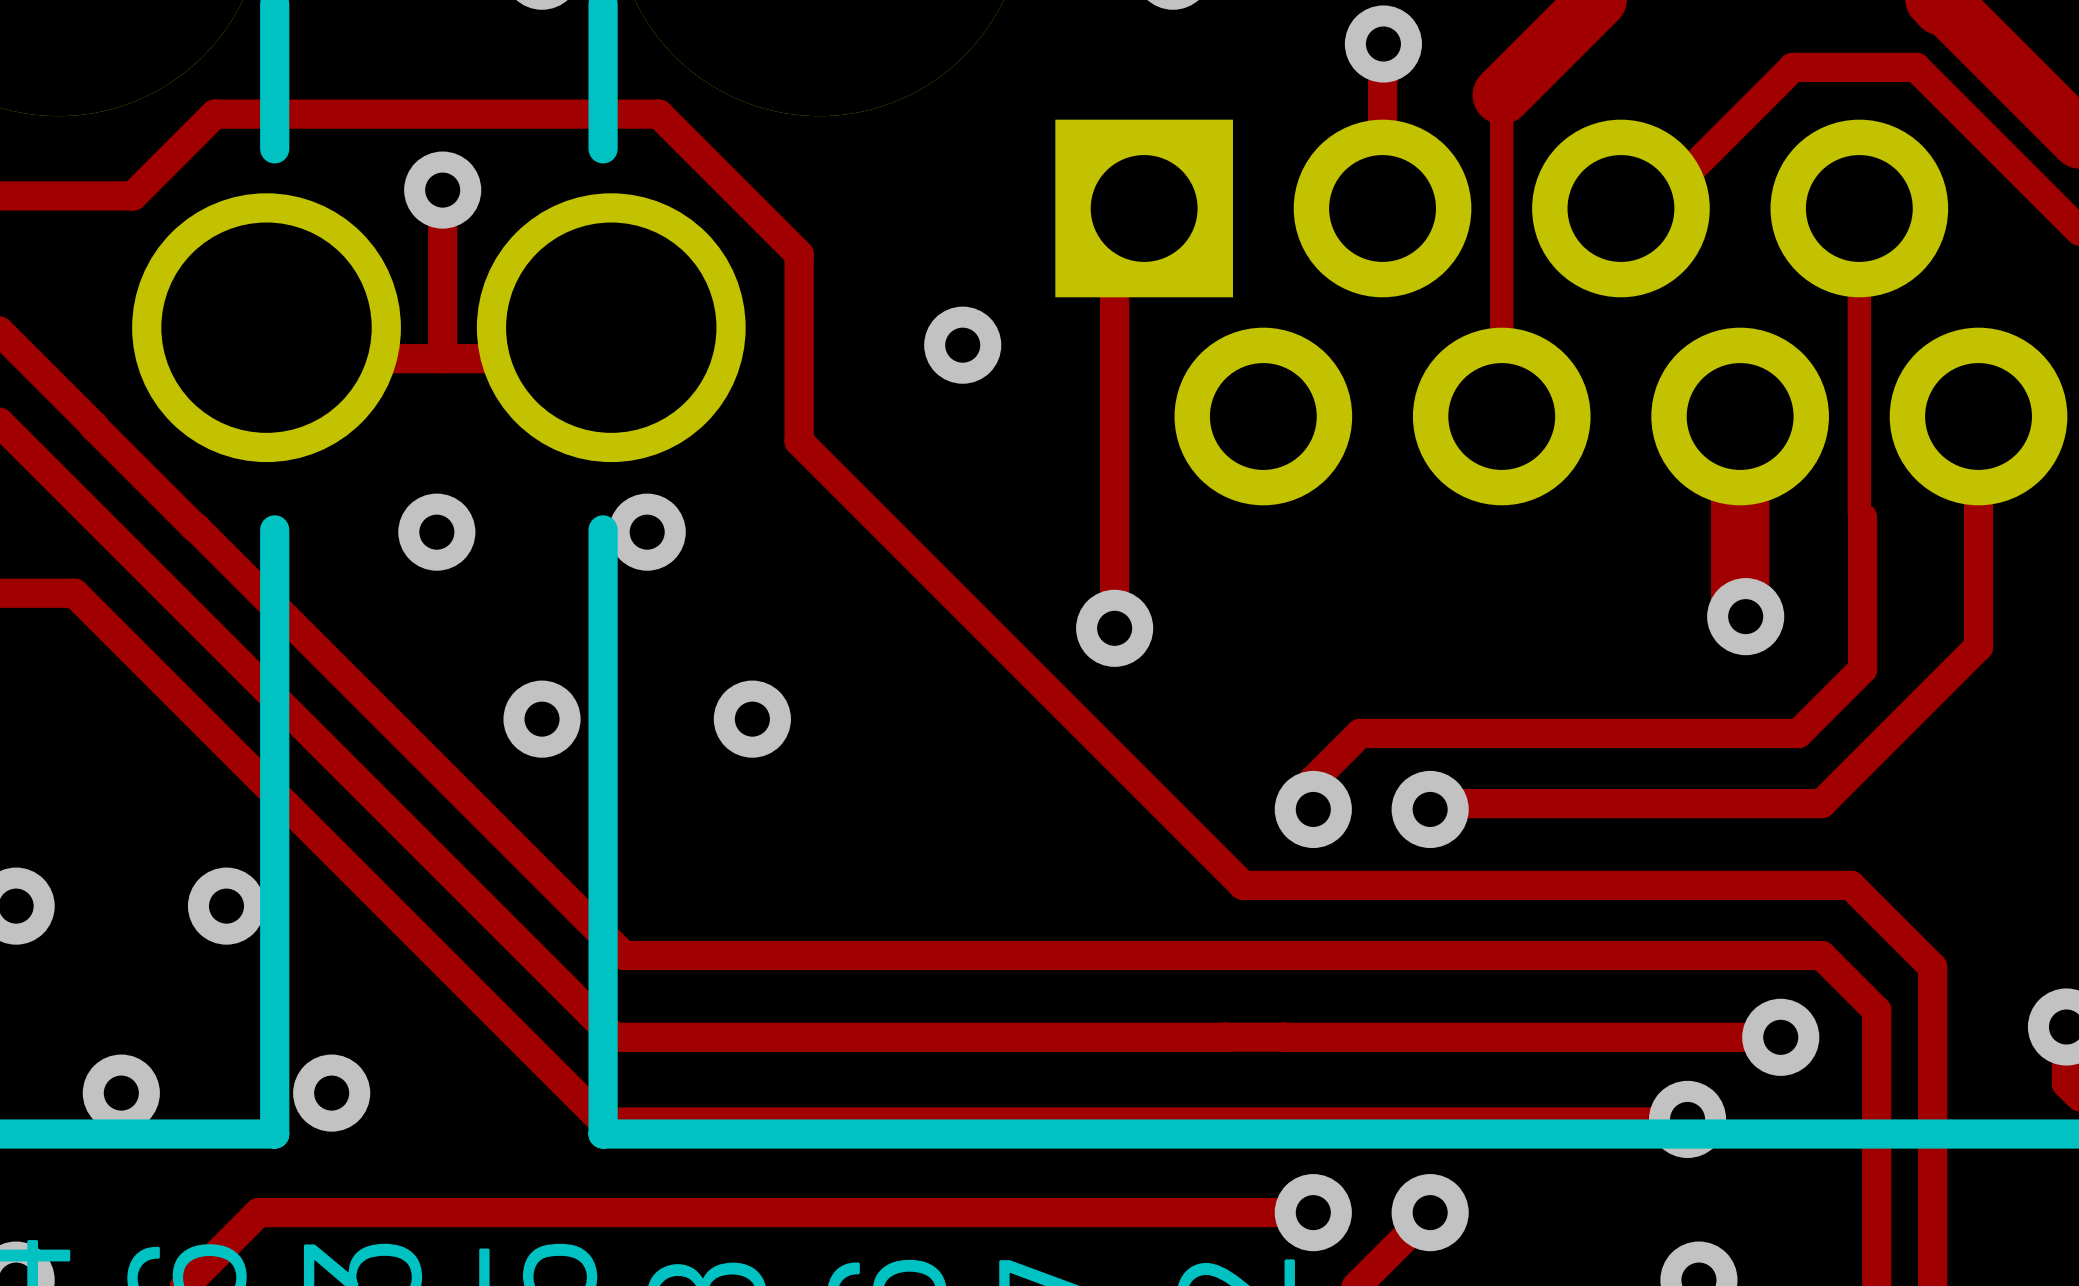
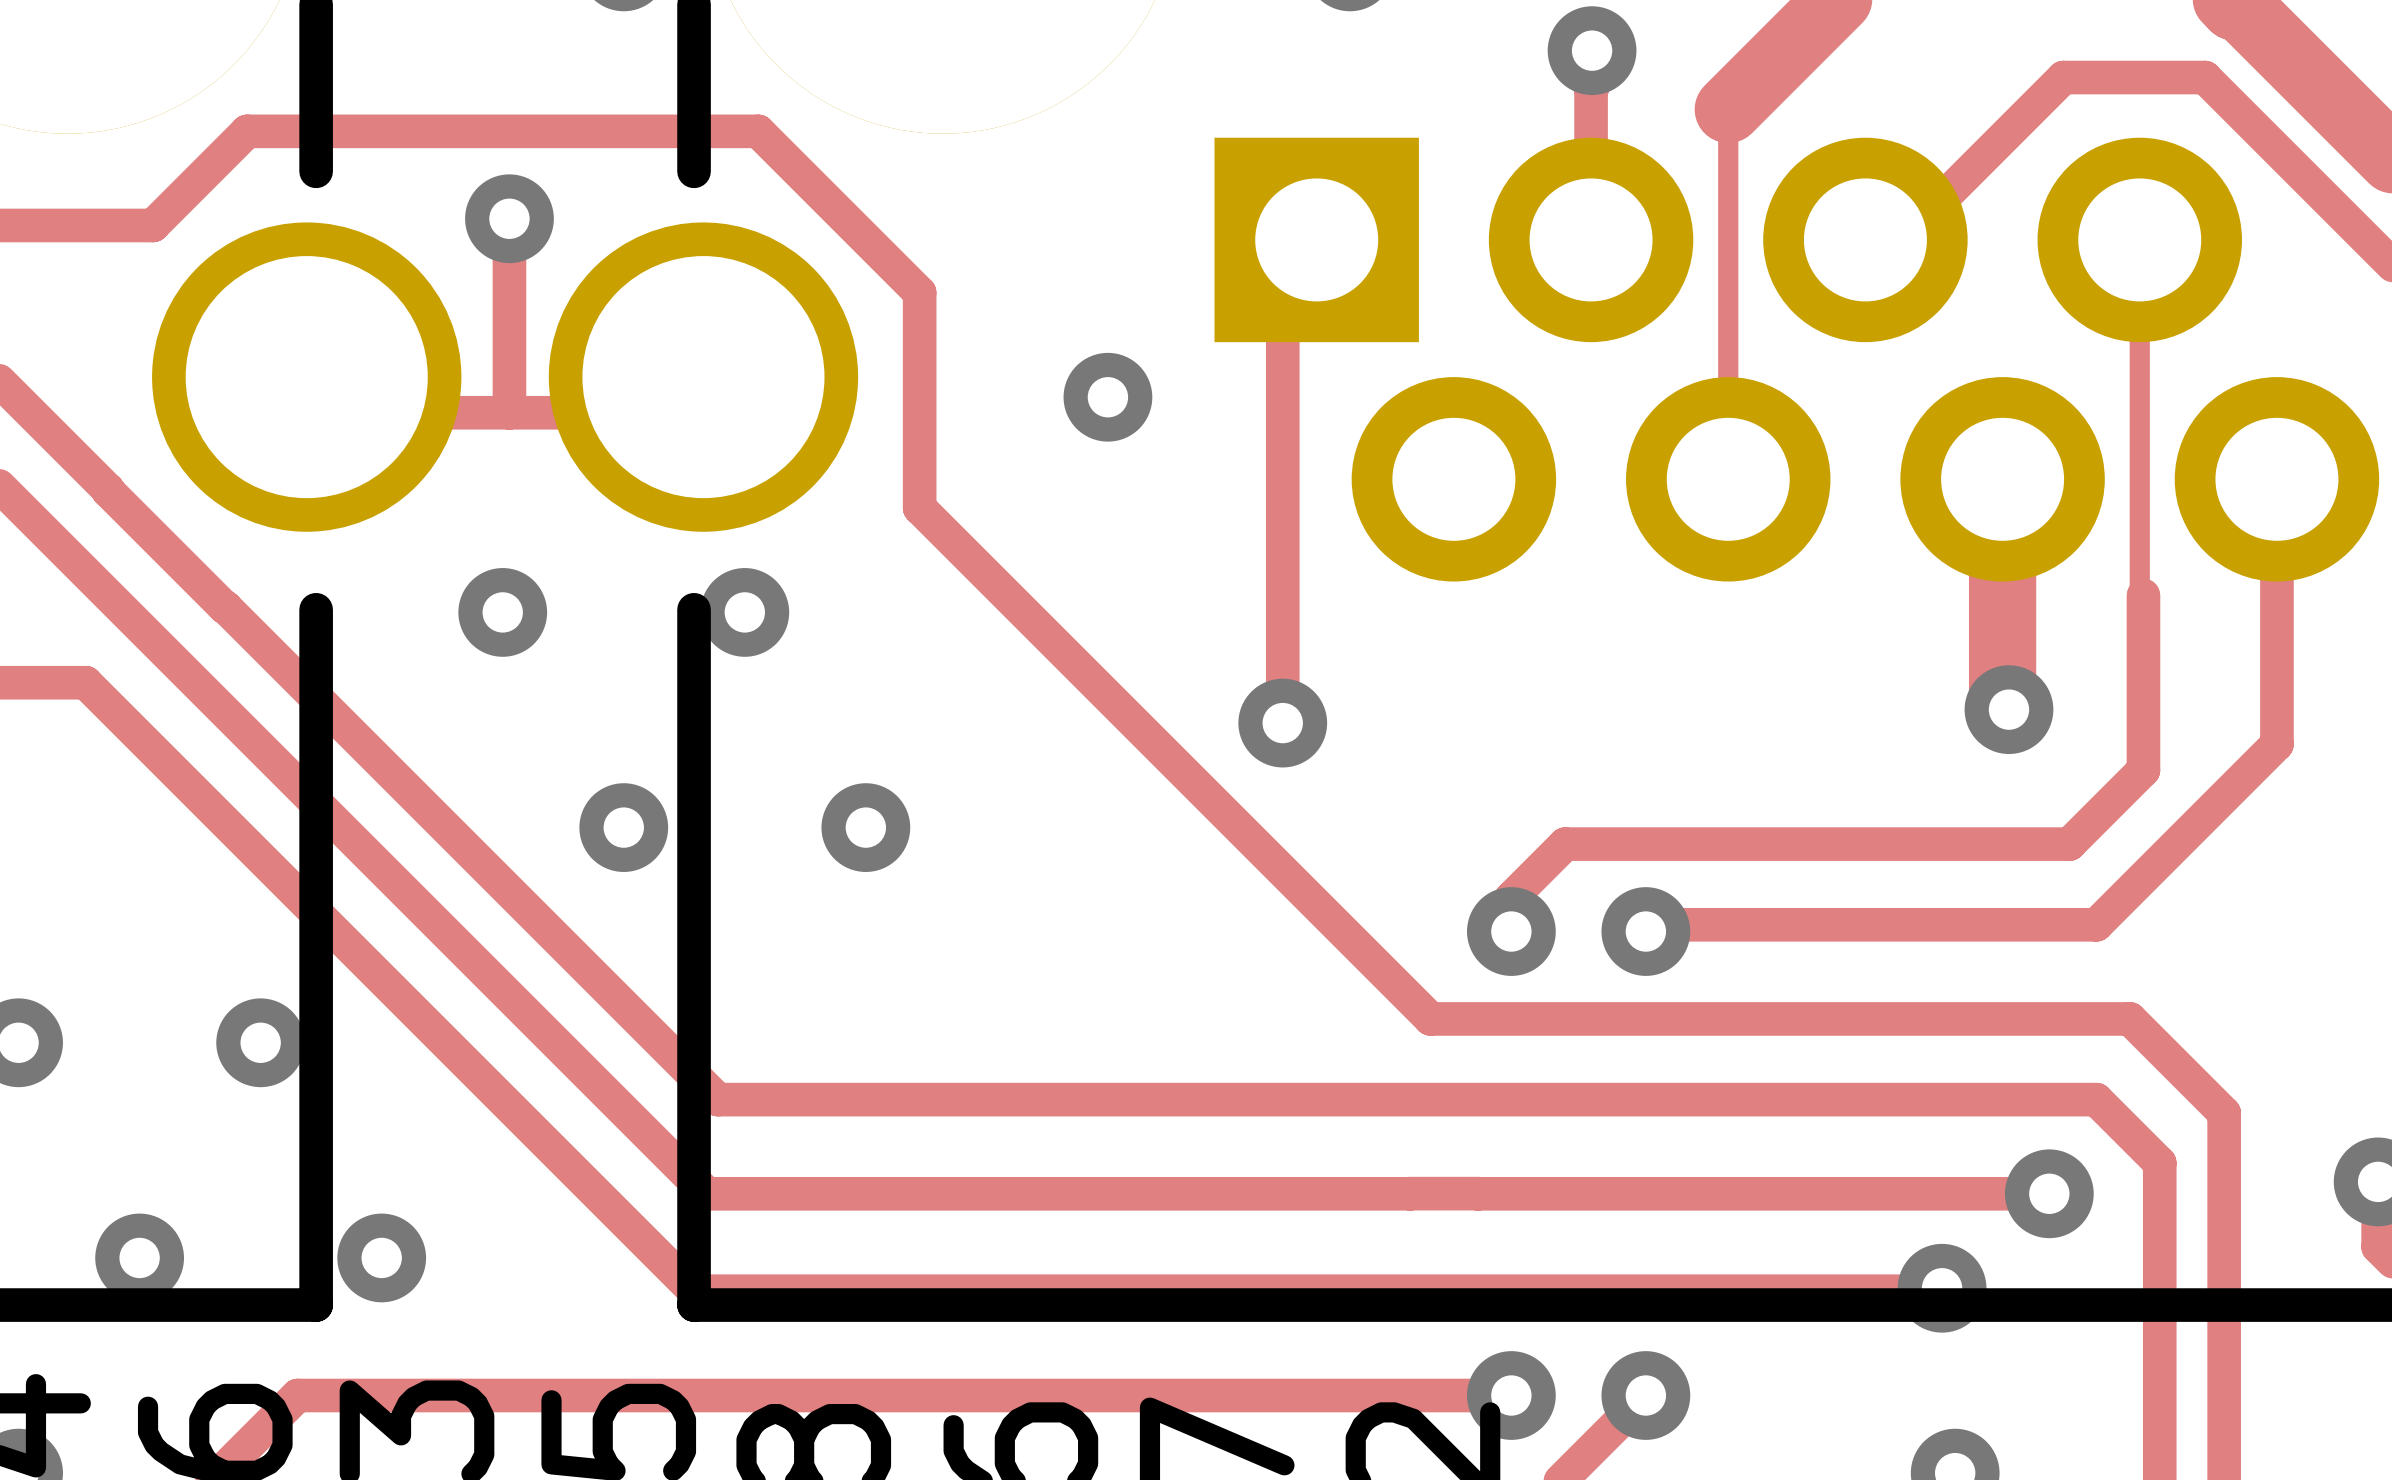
track width: thick (1501, 95) (1501, 416) -> thin (1728, 109) (1728, 479)
track width: thick (1859, 208) (1859, 514) -> thin (2139, 239) (2139, 591)

